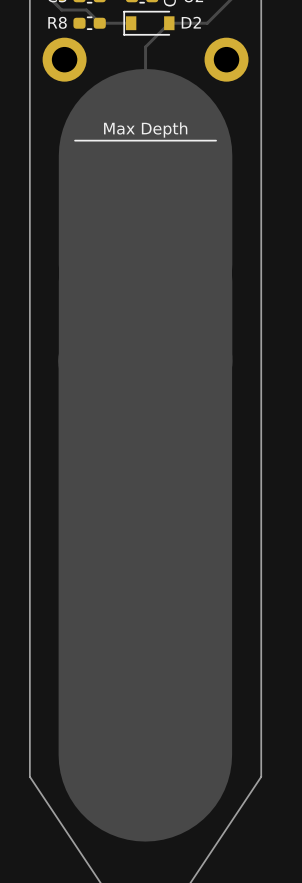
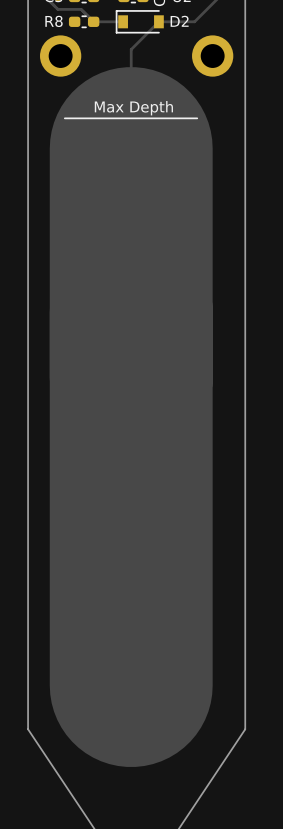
track: (145, 46) (145, 264) -> (136, 44) (131, 49) (131, 137)
text position: Max Depth (145, 129) -> Max Depth (133, 108)
line: (75, 140) (216, 140) -> (64, 118) (197, 118)
track: none -> (131, 148) (131, 685)
track: (145, 281) (145, 754) -> none

